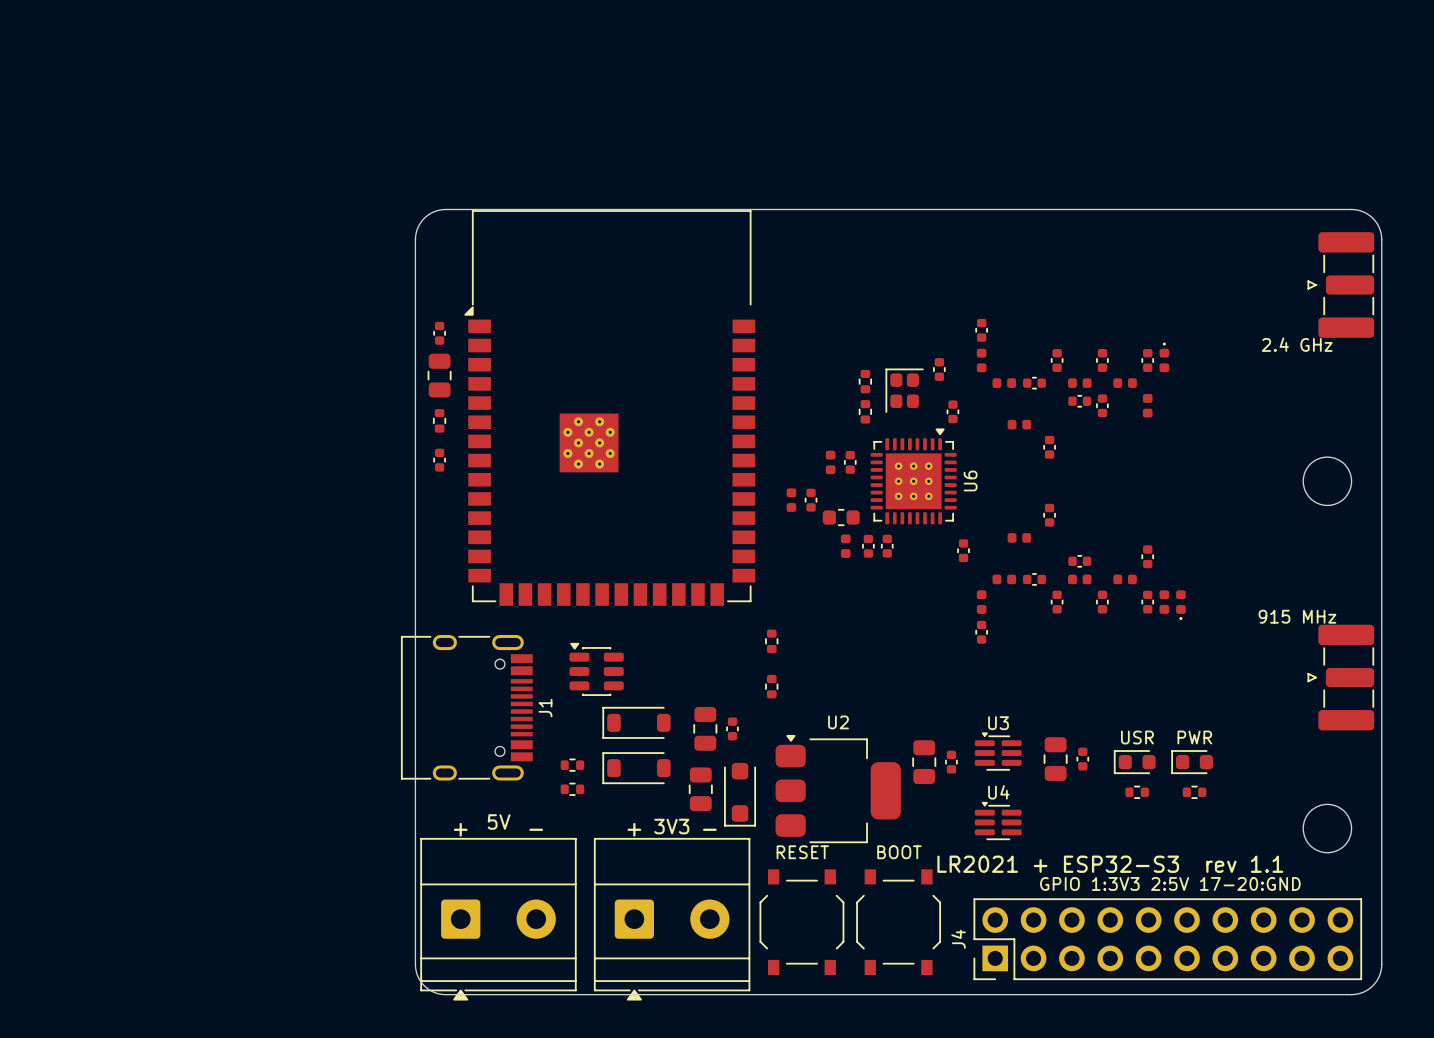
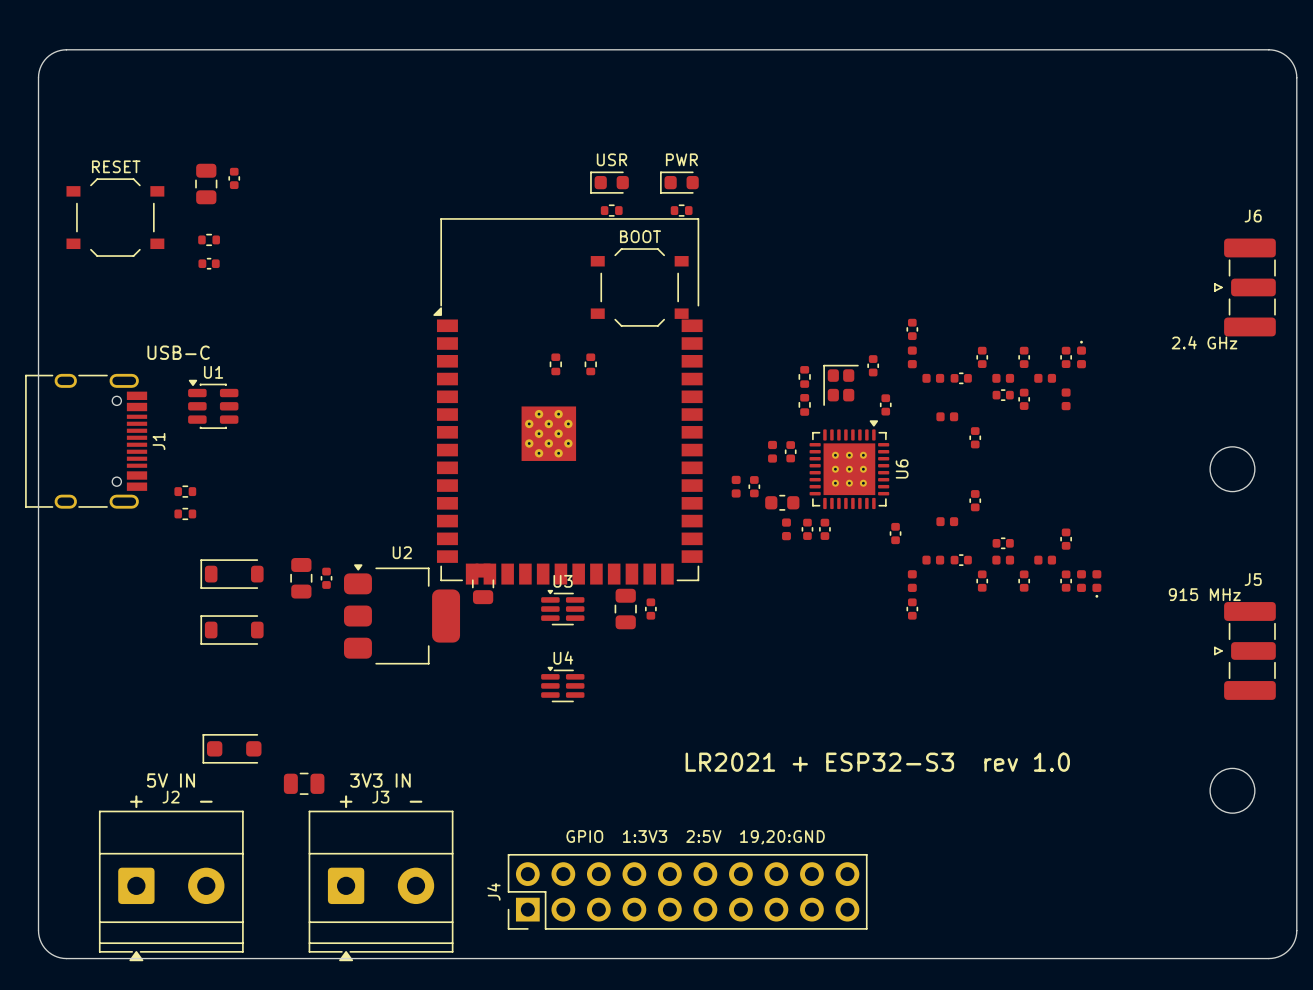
text: none -> USR (612, 159)
text: none -> PWR (681, 159)
text: none -> RESET (116, 166)
part: none -> (234, 178)
part: none -> (609, 182)
part: none -> (679, 182)
part: none -> (206, 184)
part: none -> (611, 210)
part: none -> (681, 210)
J6 name: none -> J6 (1253, 216)
part: none -> (115, 217)
board edge: (445, 209) (1351, 209) (1361, 211) (1370, 216) (1378, 226) (1381, 239) (1381, 964) (1380, 974) (1375, 983) (1364, 991) (1351, 994) (445, 994) (435, 992) (426, 988) (418, 977) (415, 964) (415, 239) (417, 229) (424, 218) (435, 211) (445, 209) -> (66, 49) (54, 52) (46, 57) (41, 65) (38, 77) (38, 930) (41, 942) (49, 952) (57, 956) (66, 958) (1268, 958) (1280, 955) (1290, 948) (1295, 939) (1296, 930) (1296, 77) (1294, 65) (1286, 55) (1278, 51) (1268, 49) (66, 49)
text: none -> BOOT (640, 236)
part: none -> (209, 239)
part: none -> (209, 263)
part: none -> (639, 287)
part: (439, 333) -> none
text: none -> USB-C (178, 352)
part: none -> (555, 364)
part: none -> (590, 364)
part: (439, 375) -> none
U1: none -> (213, 404)
part: (439, 420) -> none
part: (439, 460) -> none
part: none -> (185, 491)
part: none -> (185, 513)
part: none -> (232, 574)
part: none -> (301, 578)
part: none -> (326, 578)
J5 name: none -> J5 (1253, 579)
part: none -> (483, 583)
part: none -> (625, 609)
part: (771, 641) -> none
part: none -> (232, 630)
part: (596, 669) -> none
part: (771, 686) -> none
J1 position: (466, 707) -> (86, 441)
part: (636, 722) -> none
part: (705, 728) -> none
part position: (732, 728) -> (650, 609)
text: USR (1137, 737) -> none
text: PWR (1194, 737) -> none
U3 position: (998, 751) -> (562, 607)
part: (1055, 759) -> none
part: (1082, 759) -> none
part: (924, 762) -> none
part: (951, 762) -> none
part: (1134, 762) -> none
part: (1192, 762) -> none
part: (572, 765) -> none
part: (636, 768) -> none
part: none -> (232, 748)
part: (572, 789) -> none
part: (700, 789) -> none
U2 position: (838, 789) -> (402, 614)
part: (1137, 792) -> none
part: (1194, 792) -> none
part: (740, 794) -> none
text: none -> LR2021 + ESP32-S3 rev 1.0 (877, 762)
text: none -> 5V IN (171, 780)
text: none -> 3V3 IN (380, 780)
part: none -> (304, 783)
U4 position: (998, 821) -> (562, 684)
text: 5V (499, 822) -> none
text: 3V3 (671, 826) -> none
text position: + (460, 829) -> + (346, 801)
text position: - (536, 829) -> - (416, 801)
text: + (634, 829) -> none
text: - (709, 829) -> none
text: none -> + (136, 801)
text: none -> - (206, 801)
text: RESET (802, 852) -> none
text: BOOT (899, 852) -> none
text: LR2021 + ESP32-S3 rev 1.1 (1110, 864) -> none
text: none -> GPIO 1:3V3 2:5V 19,20:GND (695, 837)
text: GPIO 1:3V3 2:5V 17-20:GND (1170, 883) -> none
part: (498, 919) -> none
part: (672, 919) -> none
part: (801, 922) -> none
part: (898, 922) -> none
J2: none -> (171, 885)
J3: none -> (381, 885)
J4 position: (1167, 939) -> (687, 891)

